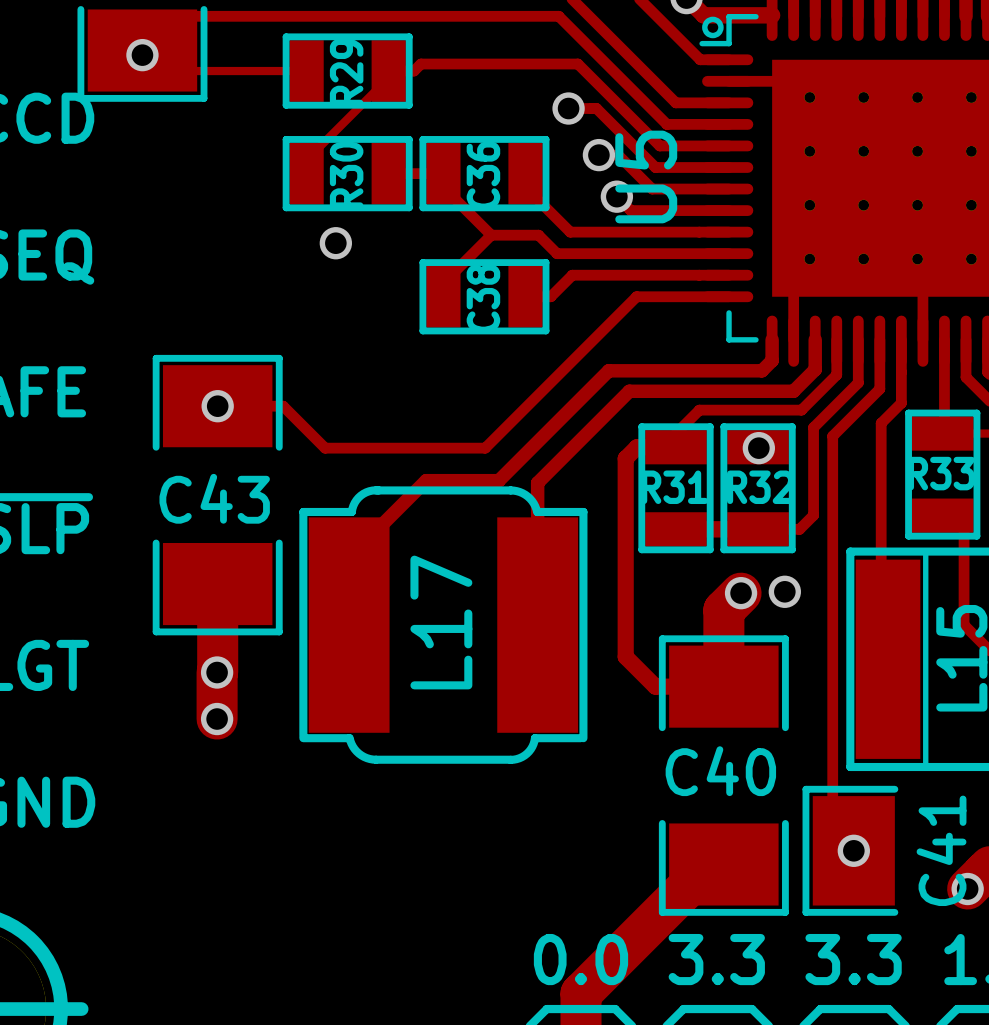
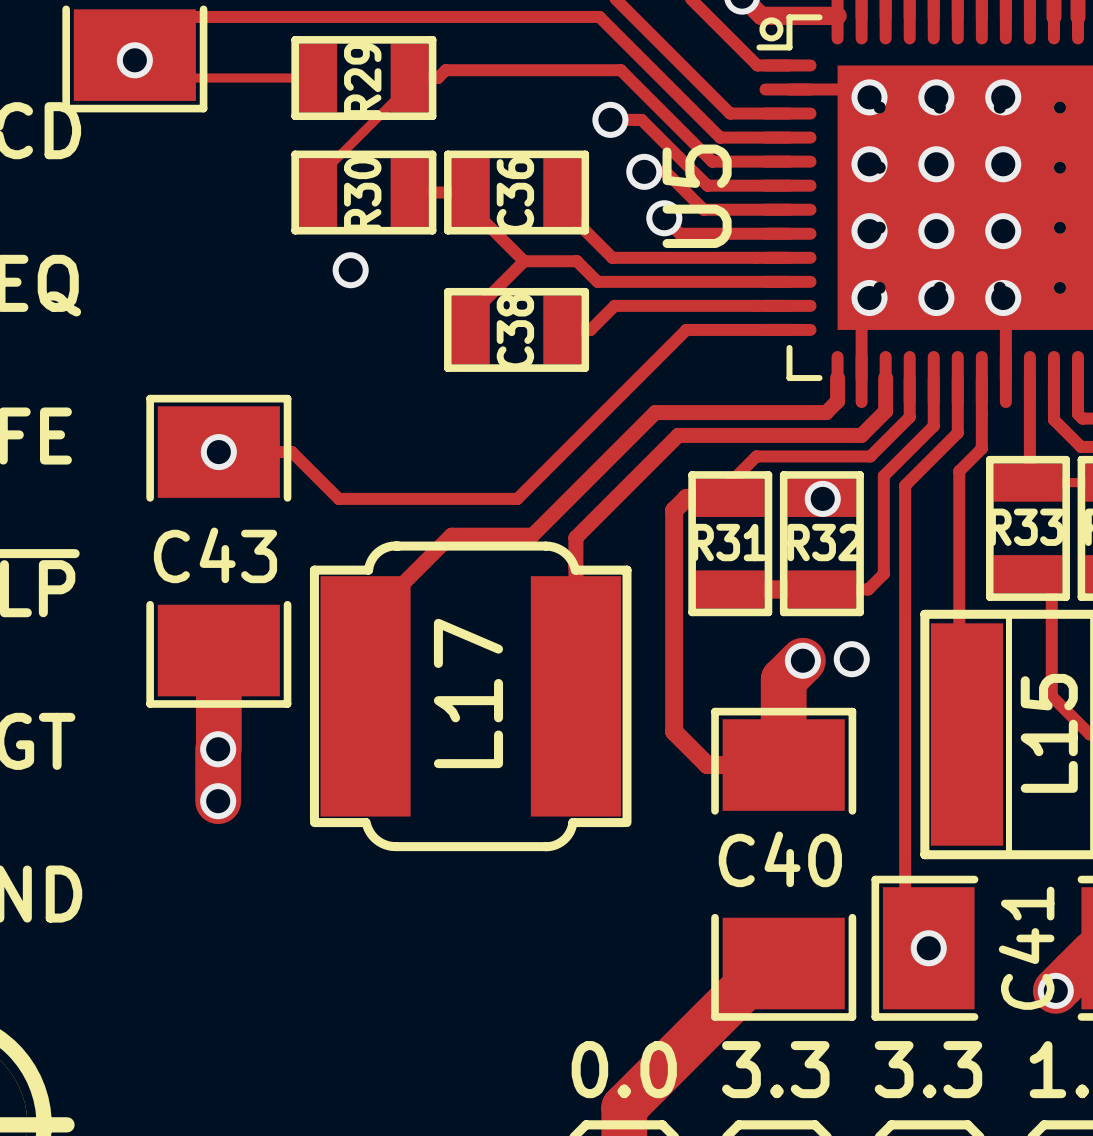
via: none -> (869, 97)
via: none -> (936, 97)
via: none -> (1003, 97)
via: none -> (869, 164)
via: none -> (936, 164)
via: none -> (1003, 164)
via: none -> (869, 231)
via: none -> (936, 231)
via: none -> (1003, 231)
via: none -> (869, 298)
via: none -> (936, 298)
via: none -> (1003, 298)

